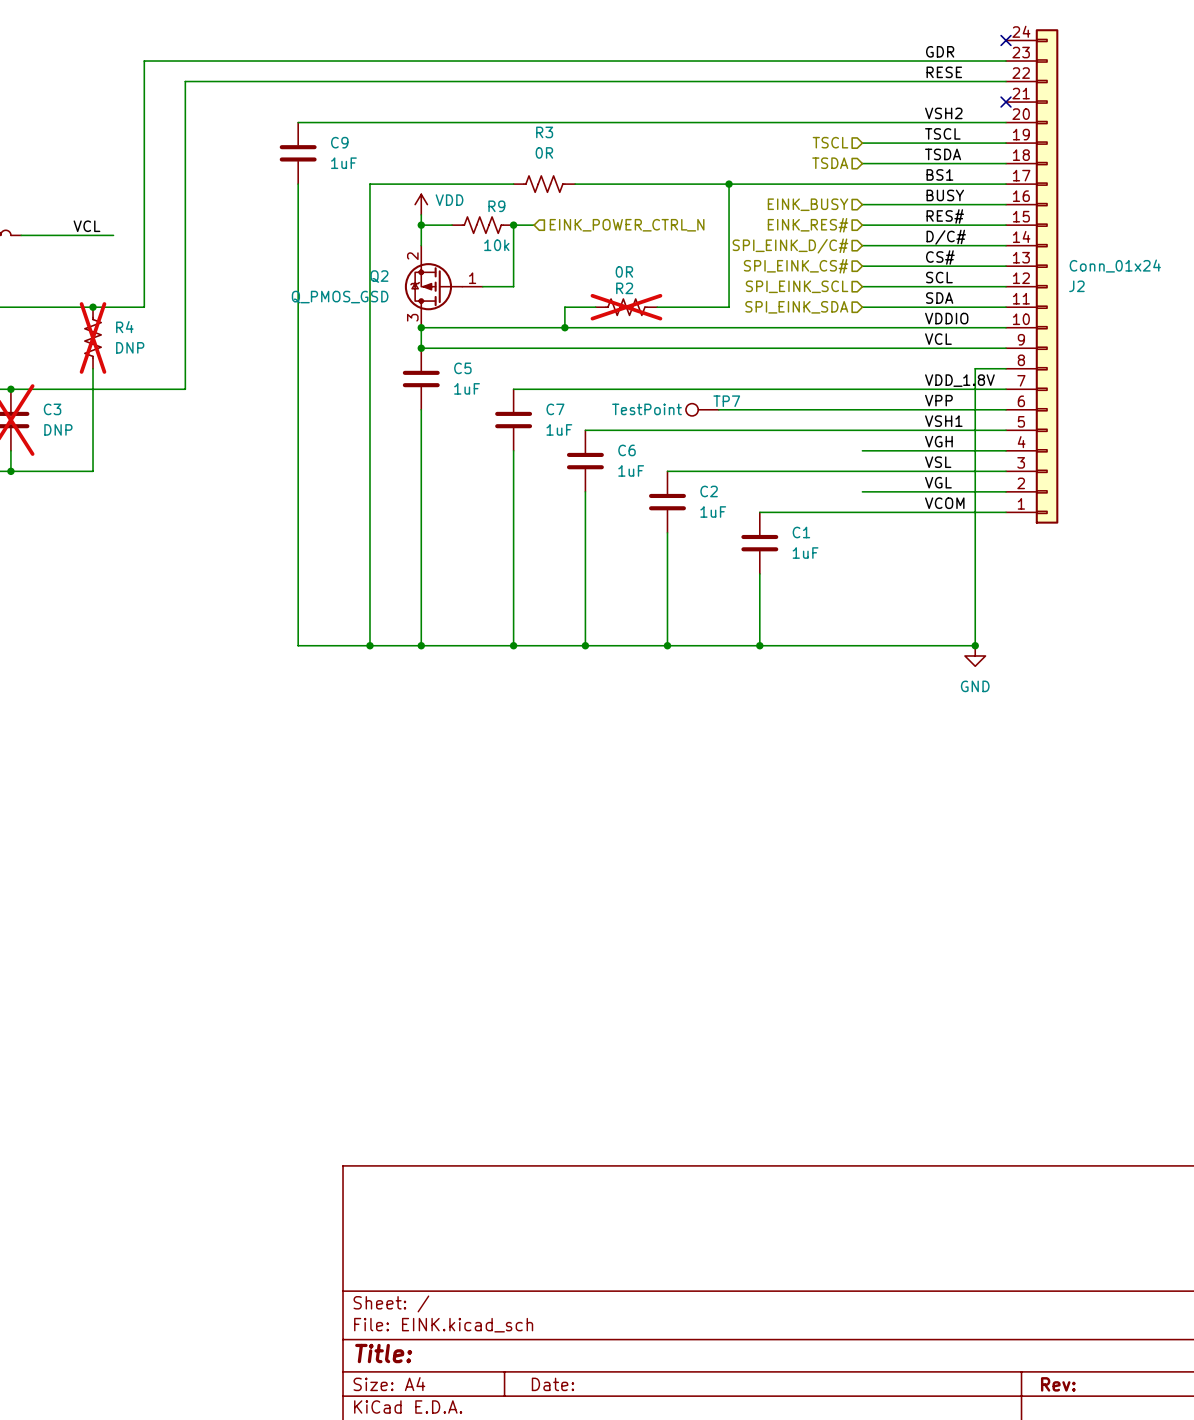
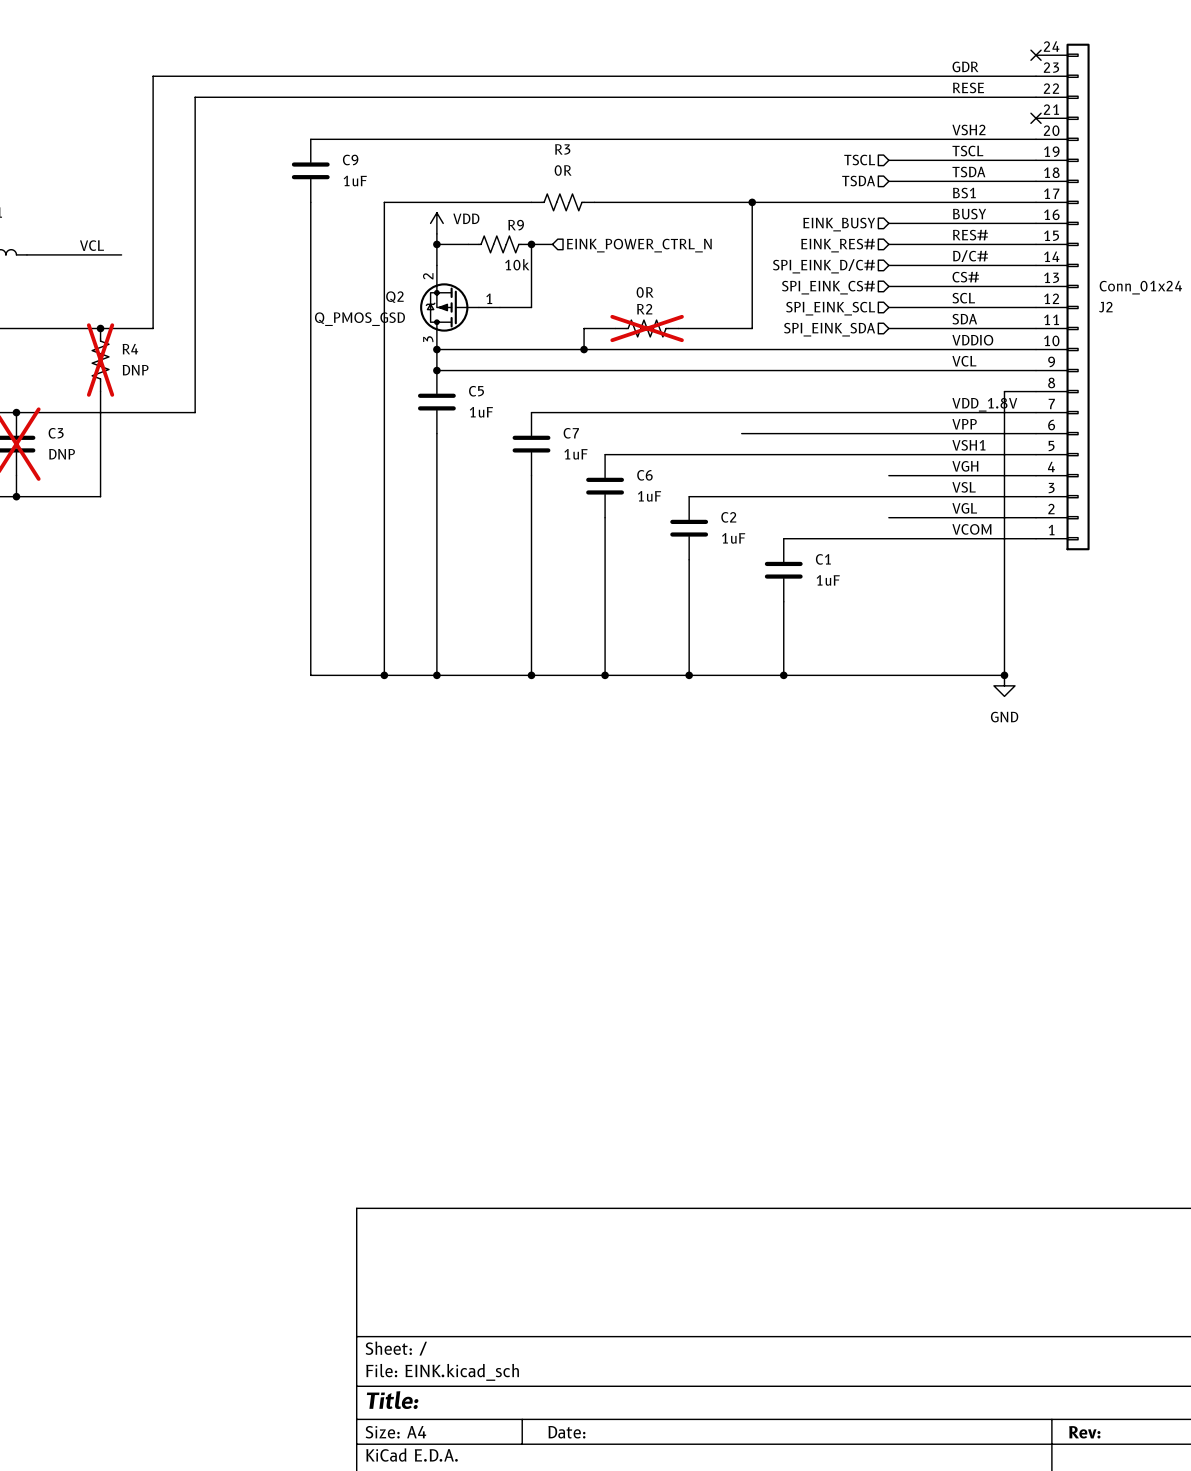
TP7: TestPoint (702, 409) -> none

